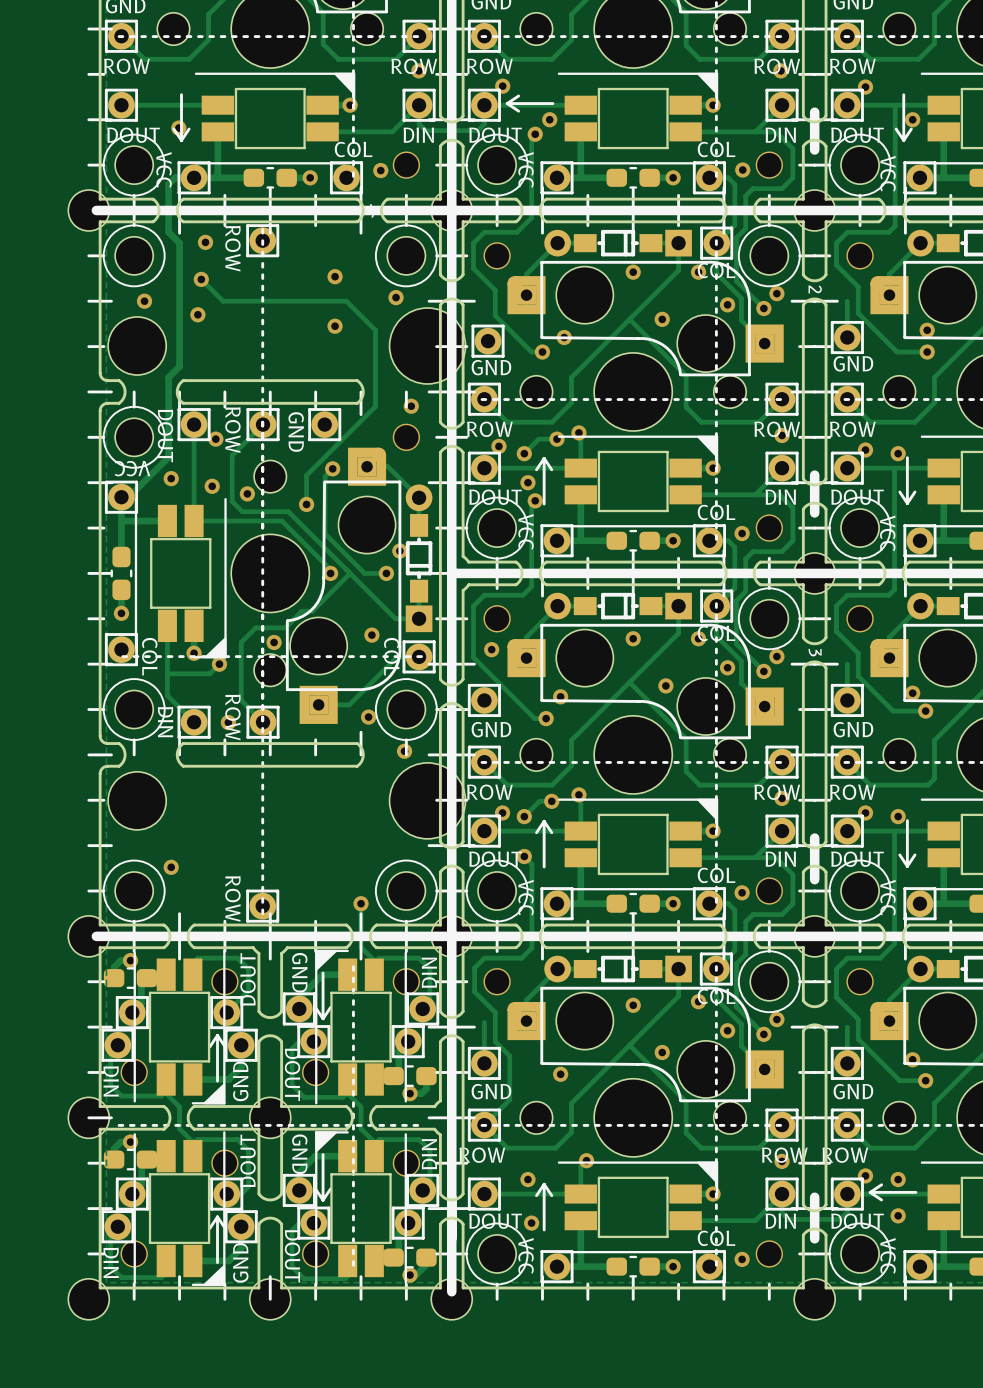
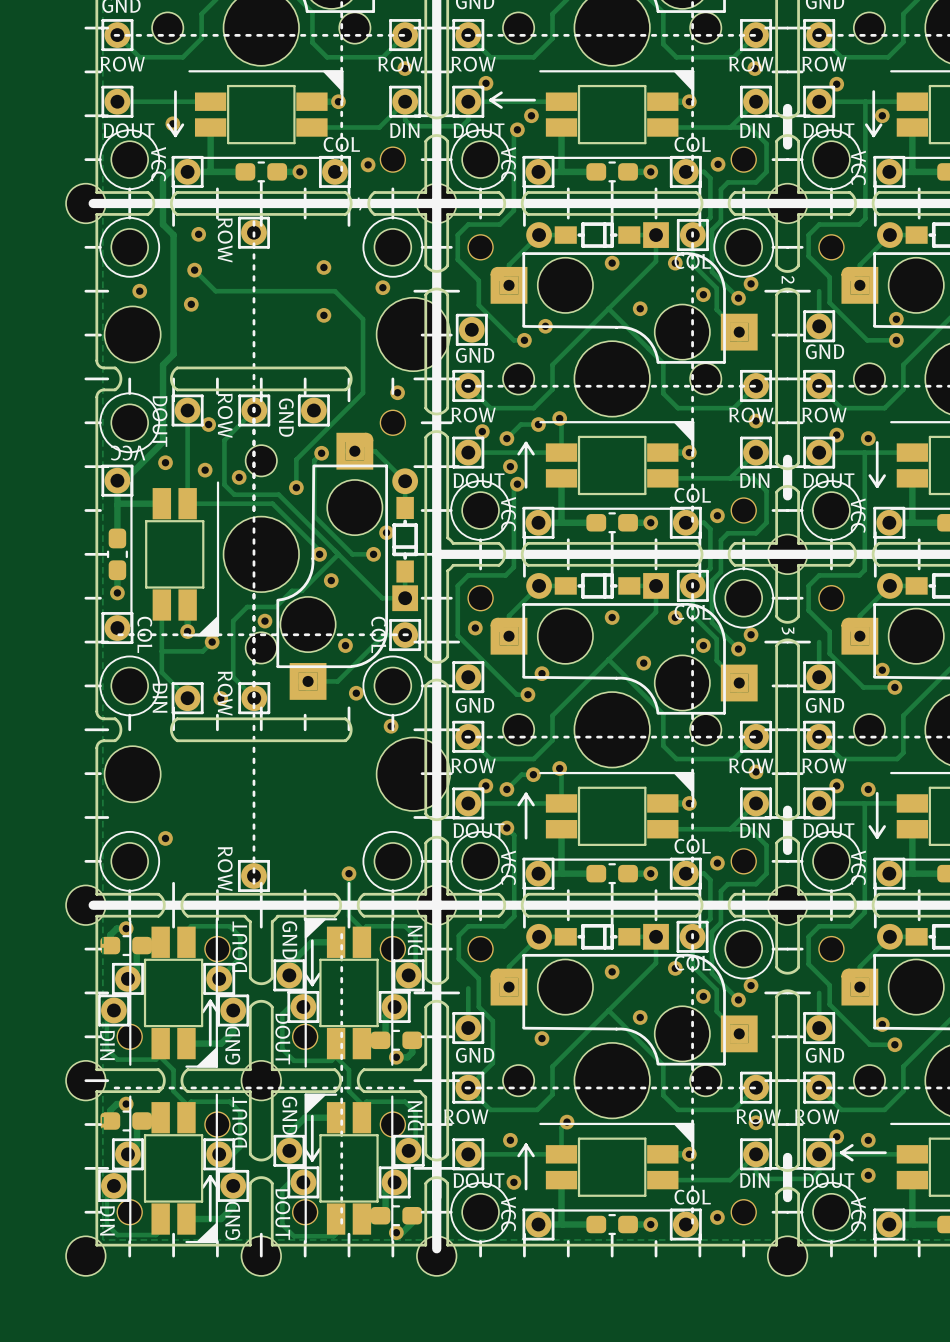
via: none -> (331, 580)
via: (371, 635) -> none
via: none -> (345, 645)

